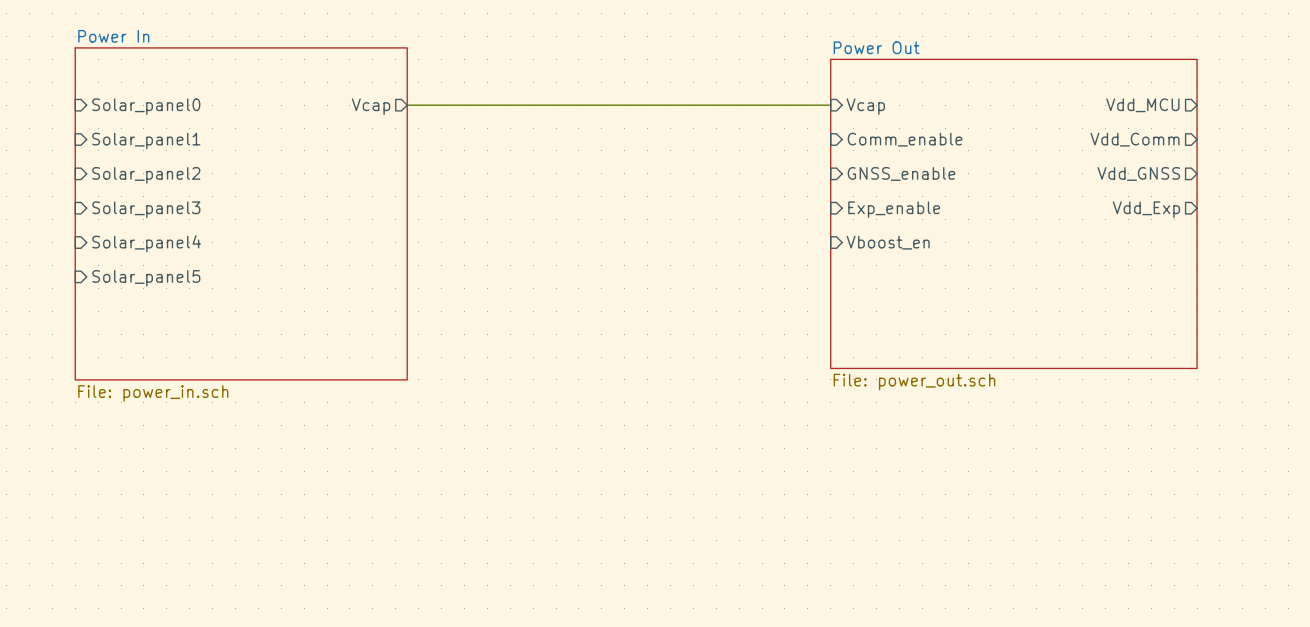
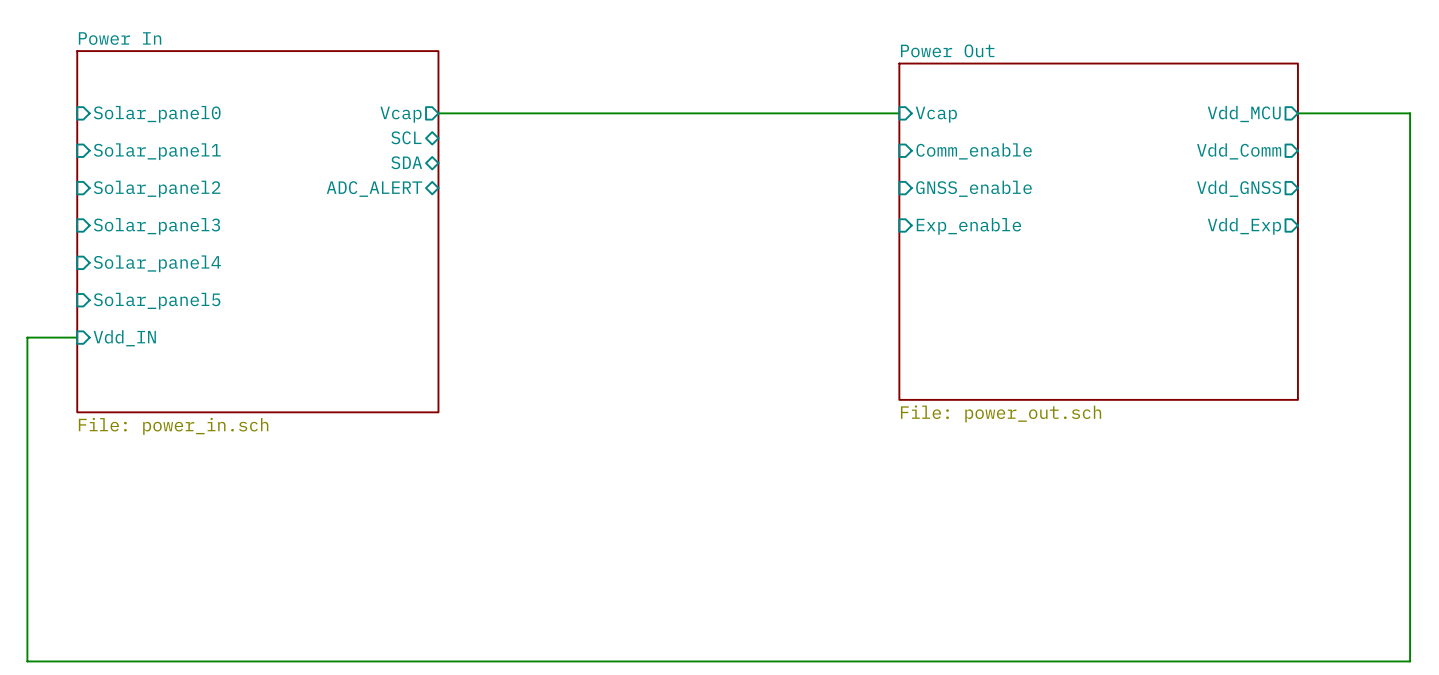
wire: none -> (1297, 113) (1410, 113) (1410, 661) (27, 661) (27, 337) (77, 337)
sheet pin: none -> SCL (406, 137)
sheet pin: none -> SDA (406, 162)
sheet pin: none -> ADC_ALERT (374, 189)
sheet pin: Vboost_en (888, 242) -> none
sheet pin: none -> Vdd_IN (124, 338)

